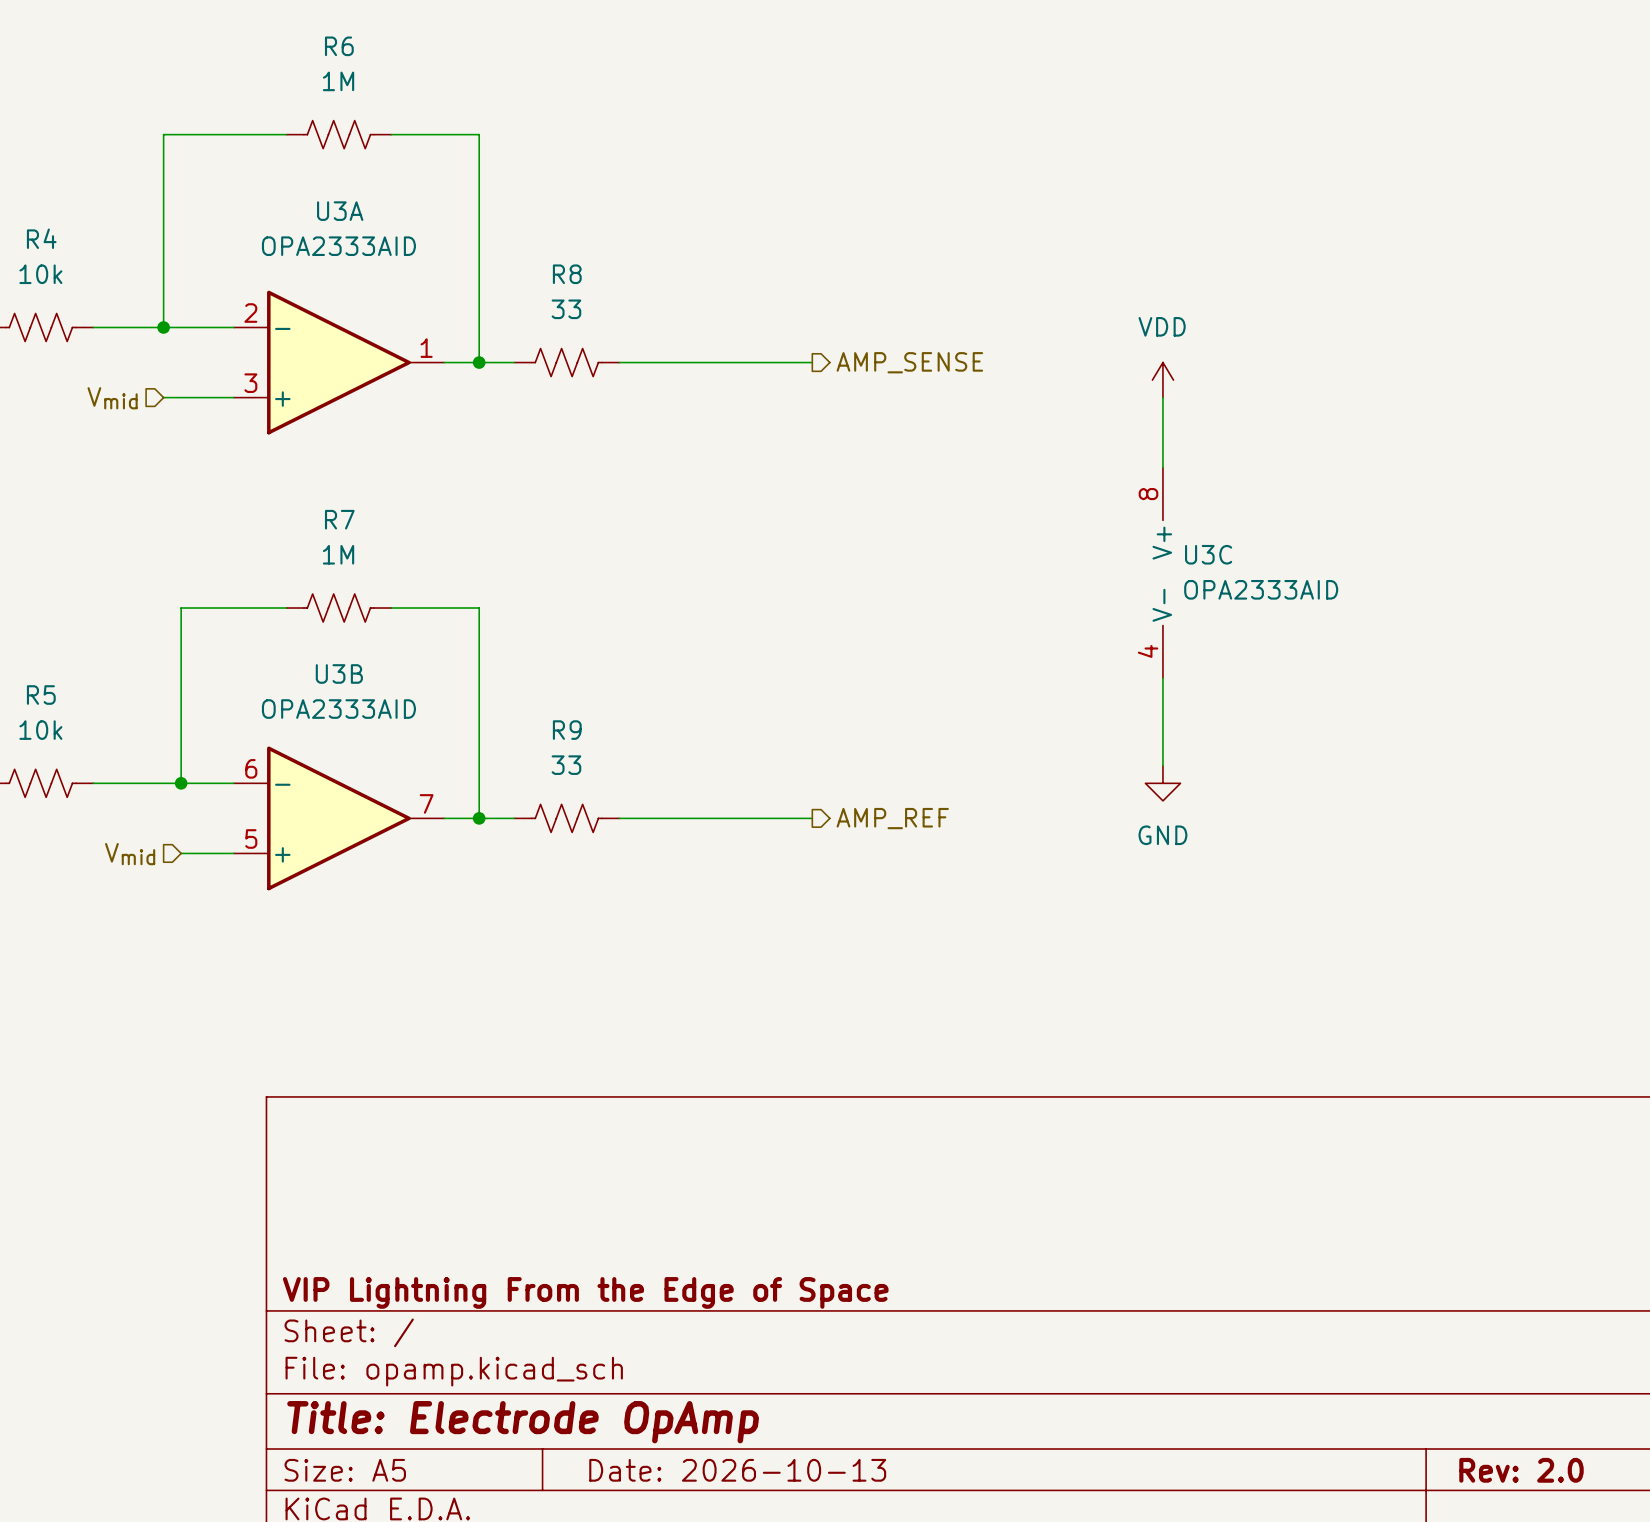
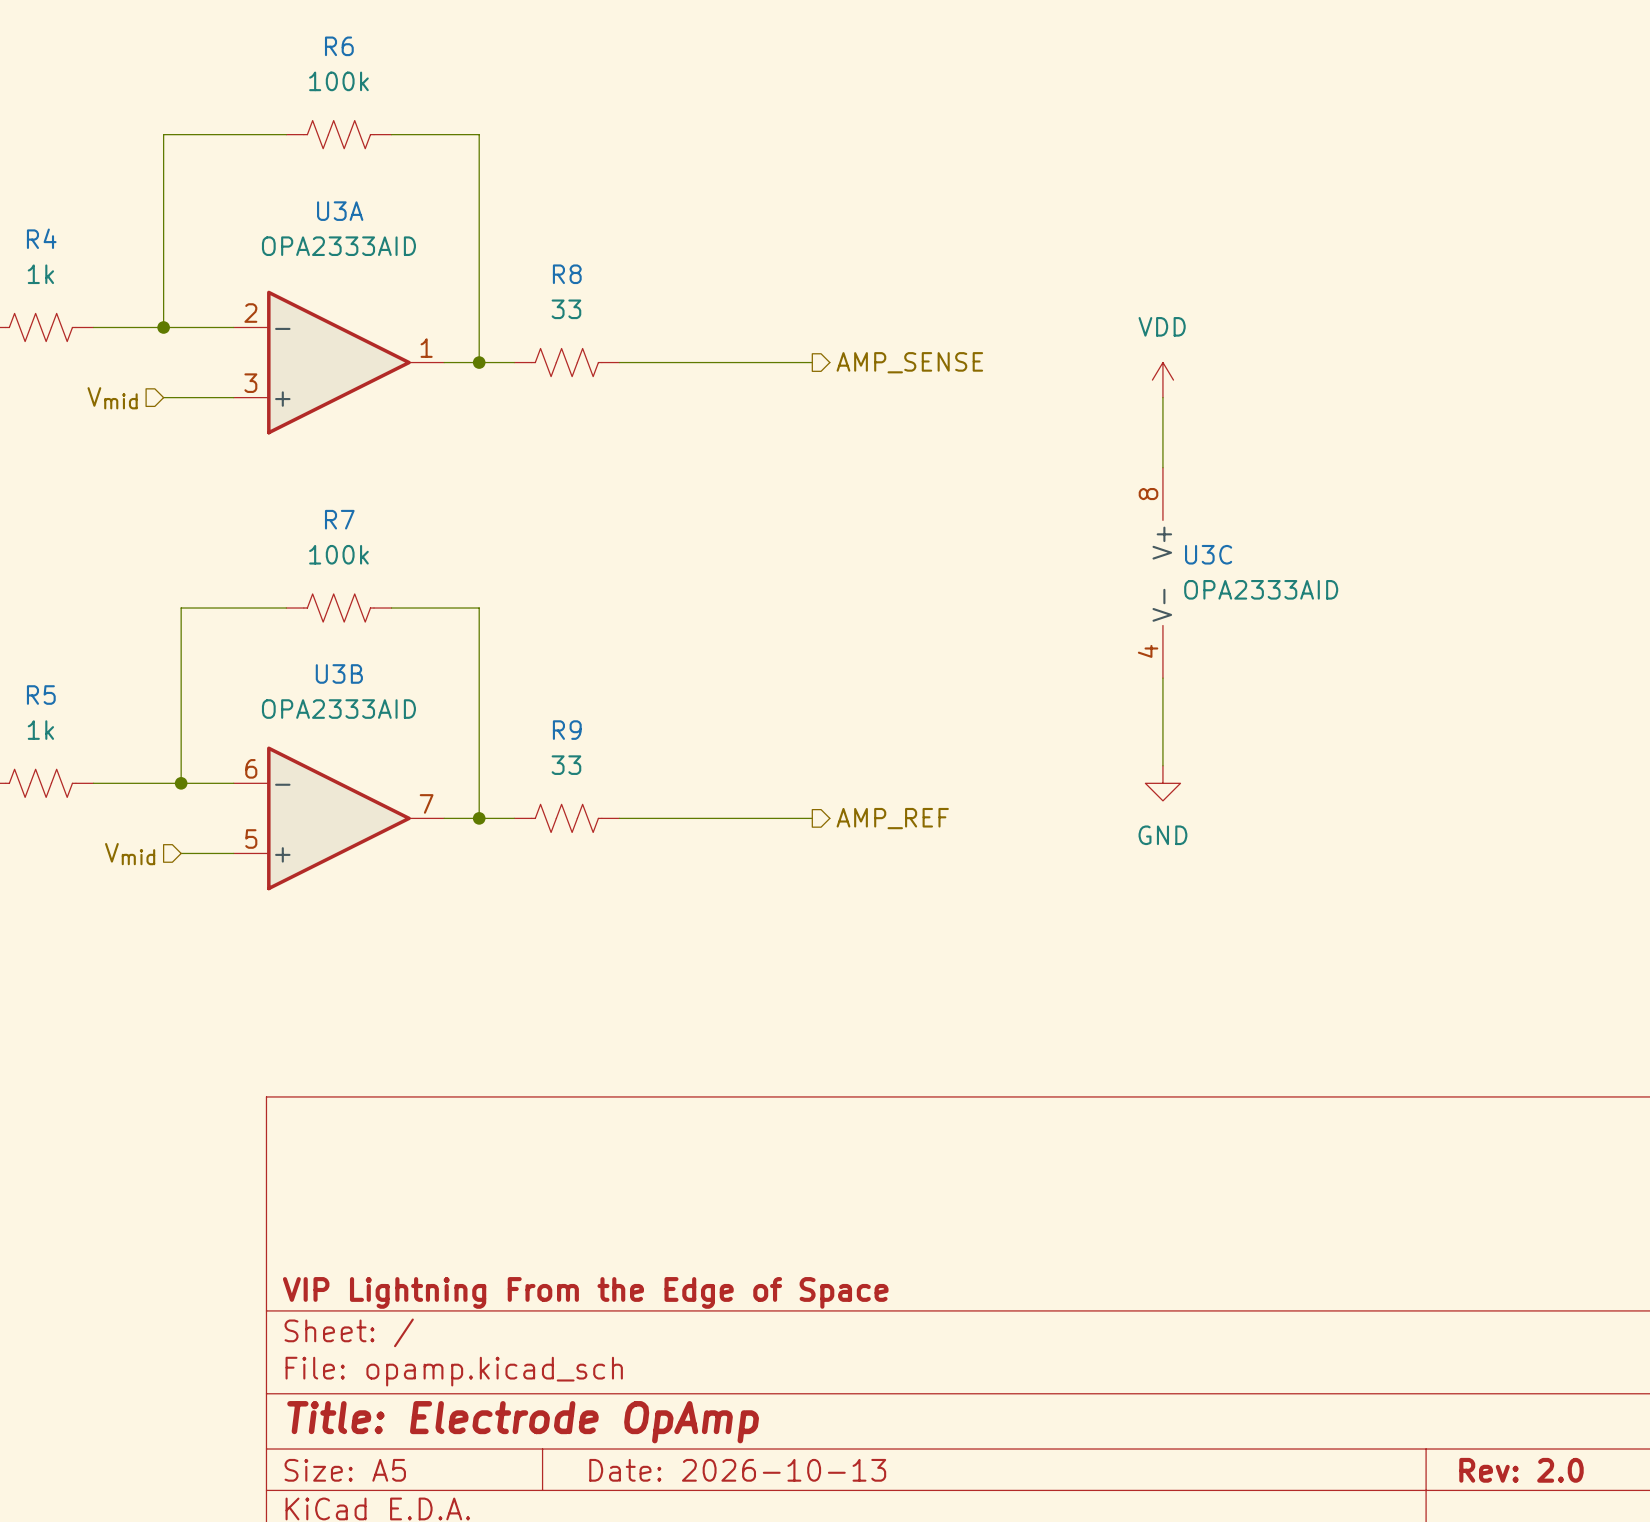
R6 value: 1M (338, 81) -> 100k (338, 81)
R4 value: 10k (40, 274) -> 1k (40, 274)
R7 value: 1M (338, 554) -> 100k (338, 554)
R5 value: 10k (40, 730) -> 1k (40, 730)

